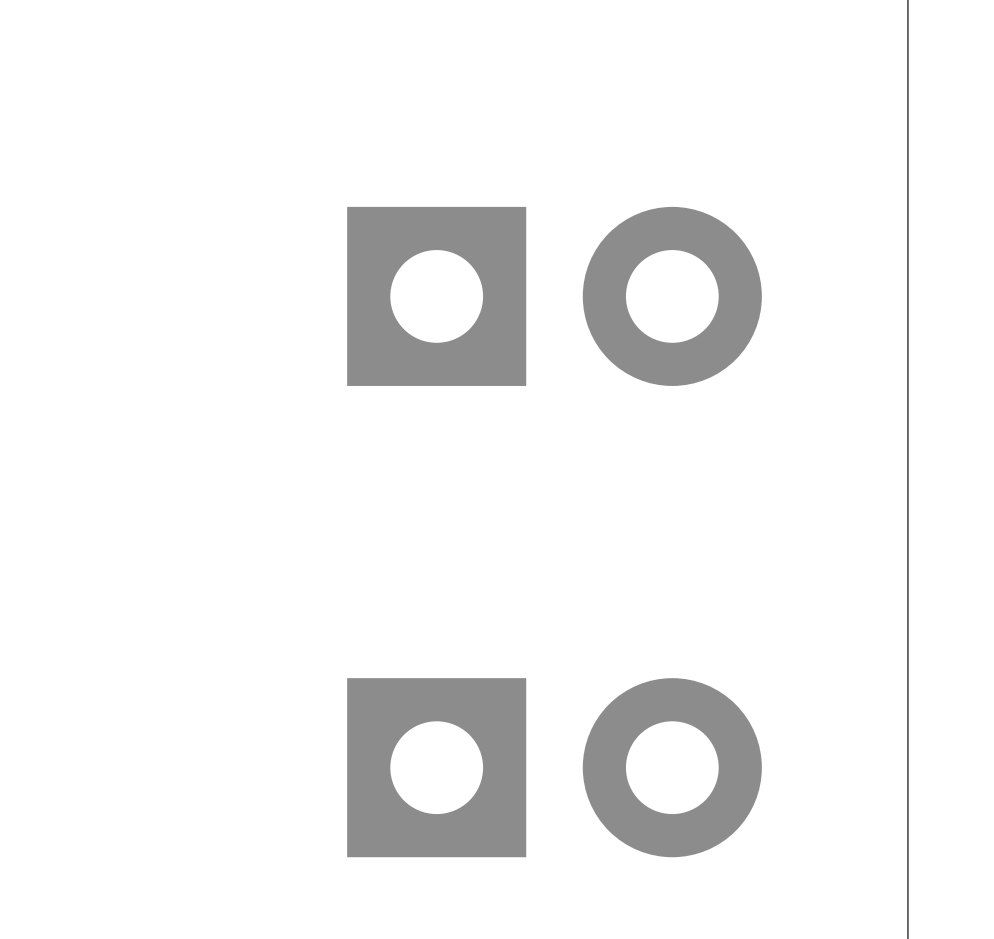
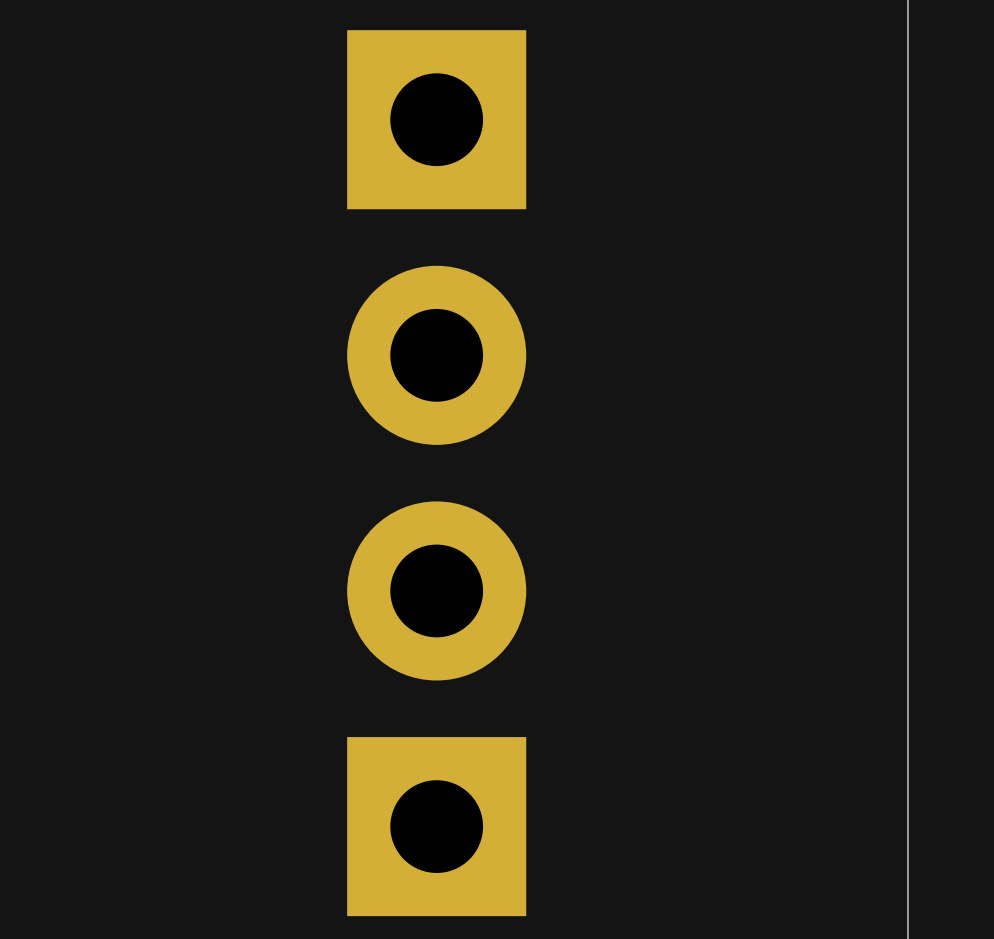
part rotation: 0° (554, 296) -> 90° clockwise (436, 237)
part rotation: 0° (554, 767) -> 90° counterclockwise (436, 708)

